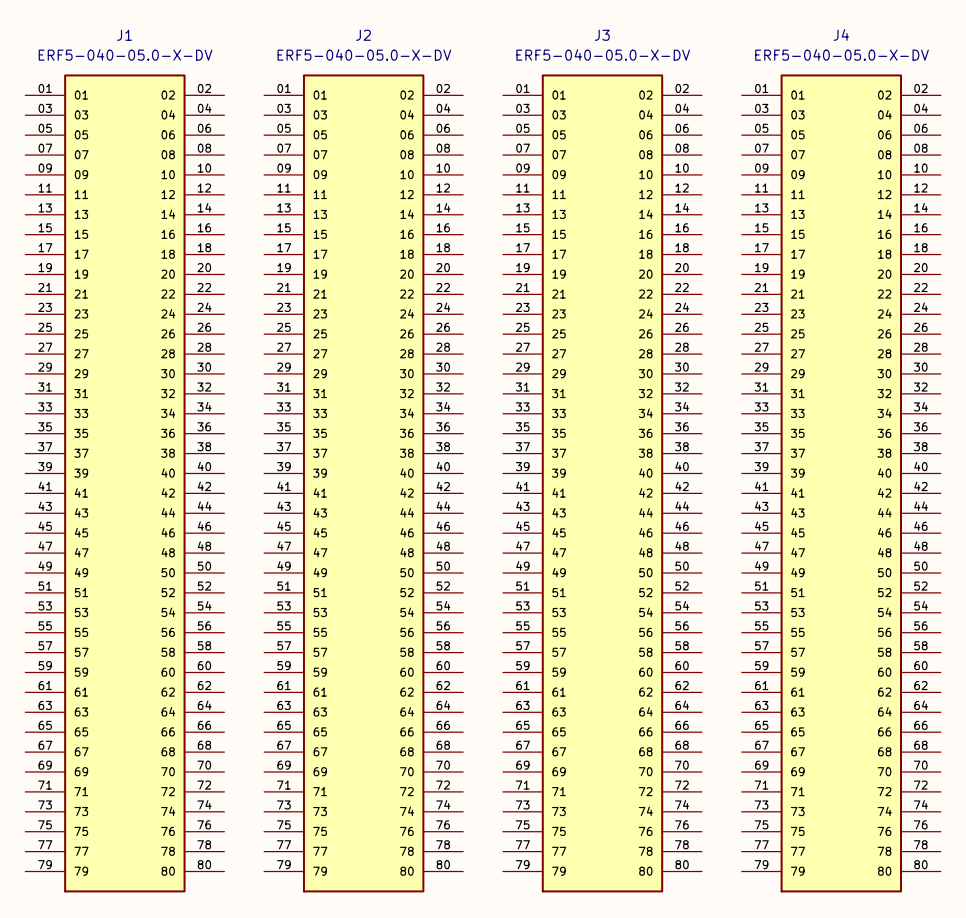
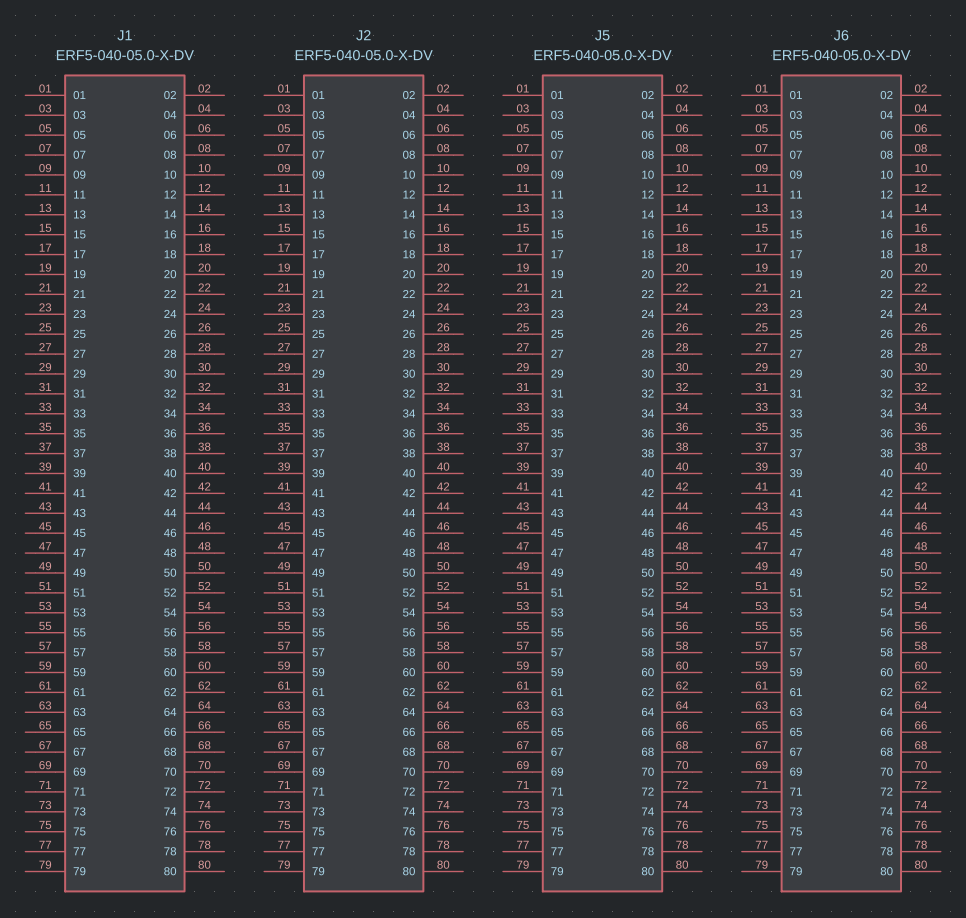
J3 name: J3 (602, 35) -> J5 (602, 35)
J4 name: J4 (841, 35) -> J6 (841, 35)

